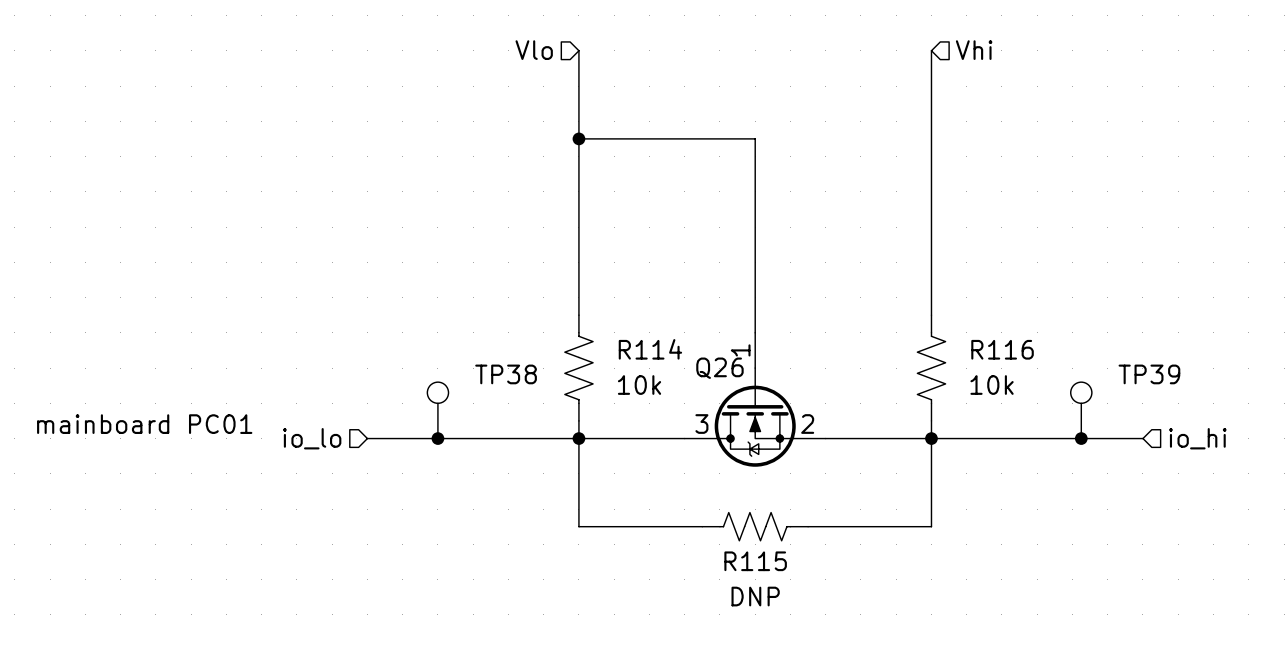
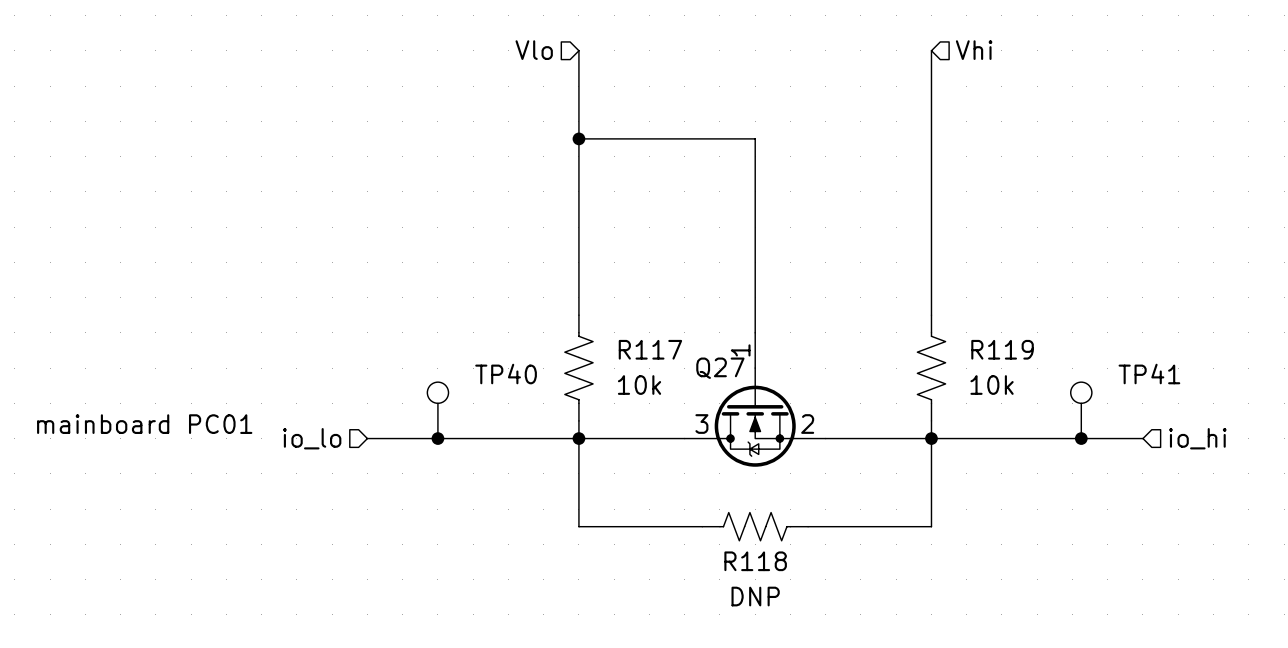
R114 name: R114 (650, 349) -> R117 (650, 349)
R116 name: R116 (1002, 349) -> R119 (1002, 349)
Q26 name: Q26 (719, 368) -> Q27 (720, 368)
TP38 name: TP38 (506, 374) -> TP40 (506, 374)
TP39 name: TP39 (1149, 374) -> TP41 (1149, 374)
R115 name: R115 (755, 561) -> R118 (755, 561)

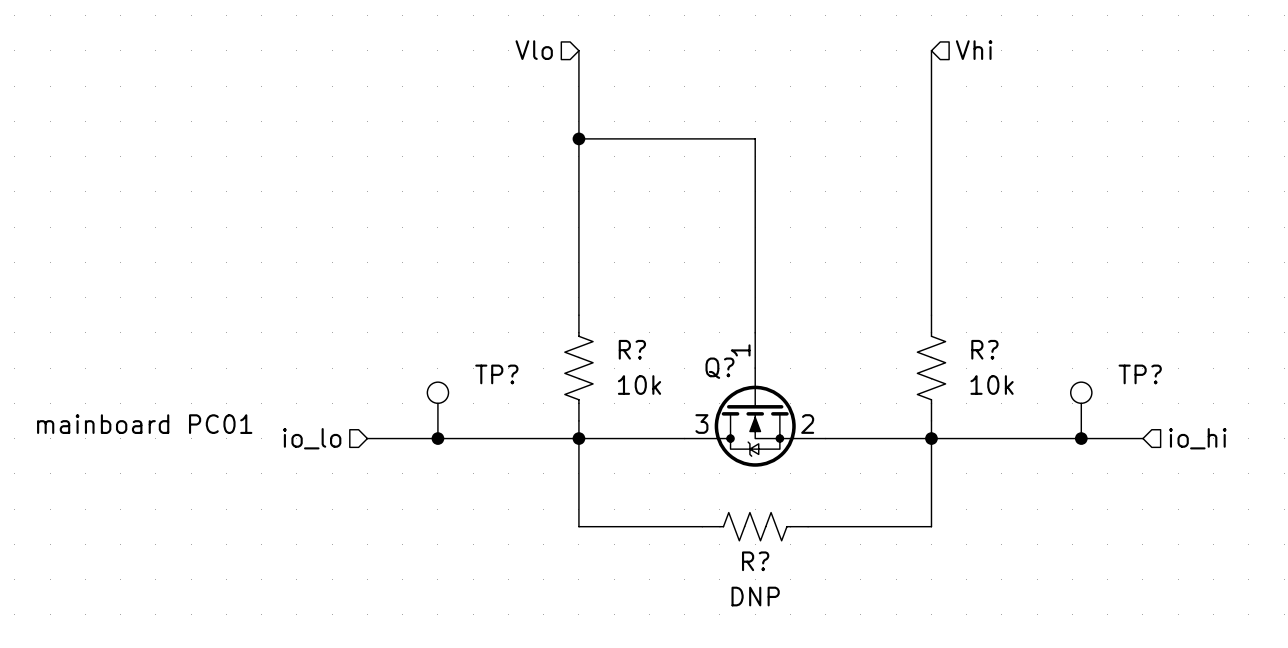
R117 name: R117 (650, 349) -> R? (632, 349)
R119 name: R119 (1002, 349) -> R? (984, 349)
Q27 name: Q27 (720, 368) -> Q? (719, 368)
TP40 name: TP40 (506, 374) -> TP? (496, 374)
TP41 name: TP41 (1149, 374) -> TP? (1140, 374)
R118 name: R118 (755, 561) -> R? (755, 561)

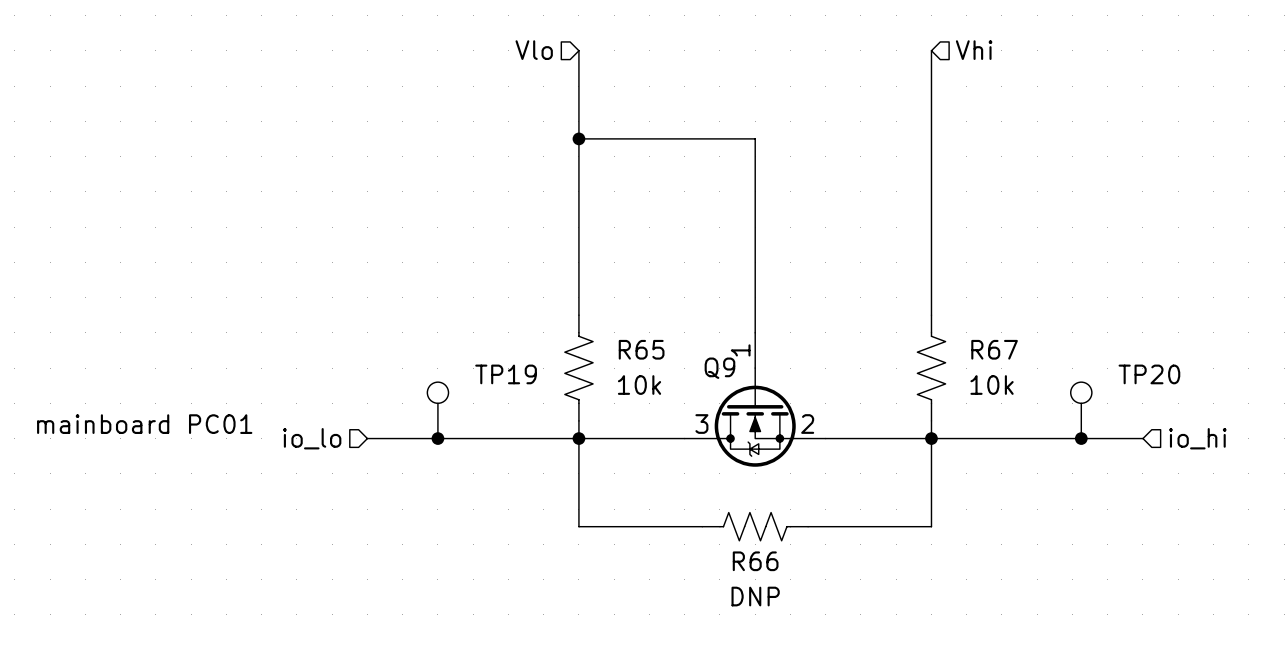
R? name: R? (632, 349) -> R65 (641, 349)
R? name: R? (984, 349) -> R67 (994, 349)
Q? name: Q? (719, 368) -> Q9 (719, 368)
TP? name: TP? (496, 374) -> TP19 (506, 374)
TP? name: TP? (1140, 374) -> TP20 (1149, 374)
R? name: R? (755, 561) -> R66 (755, 561)

